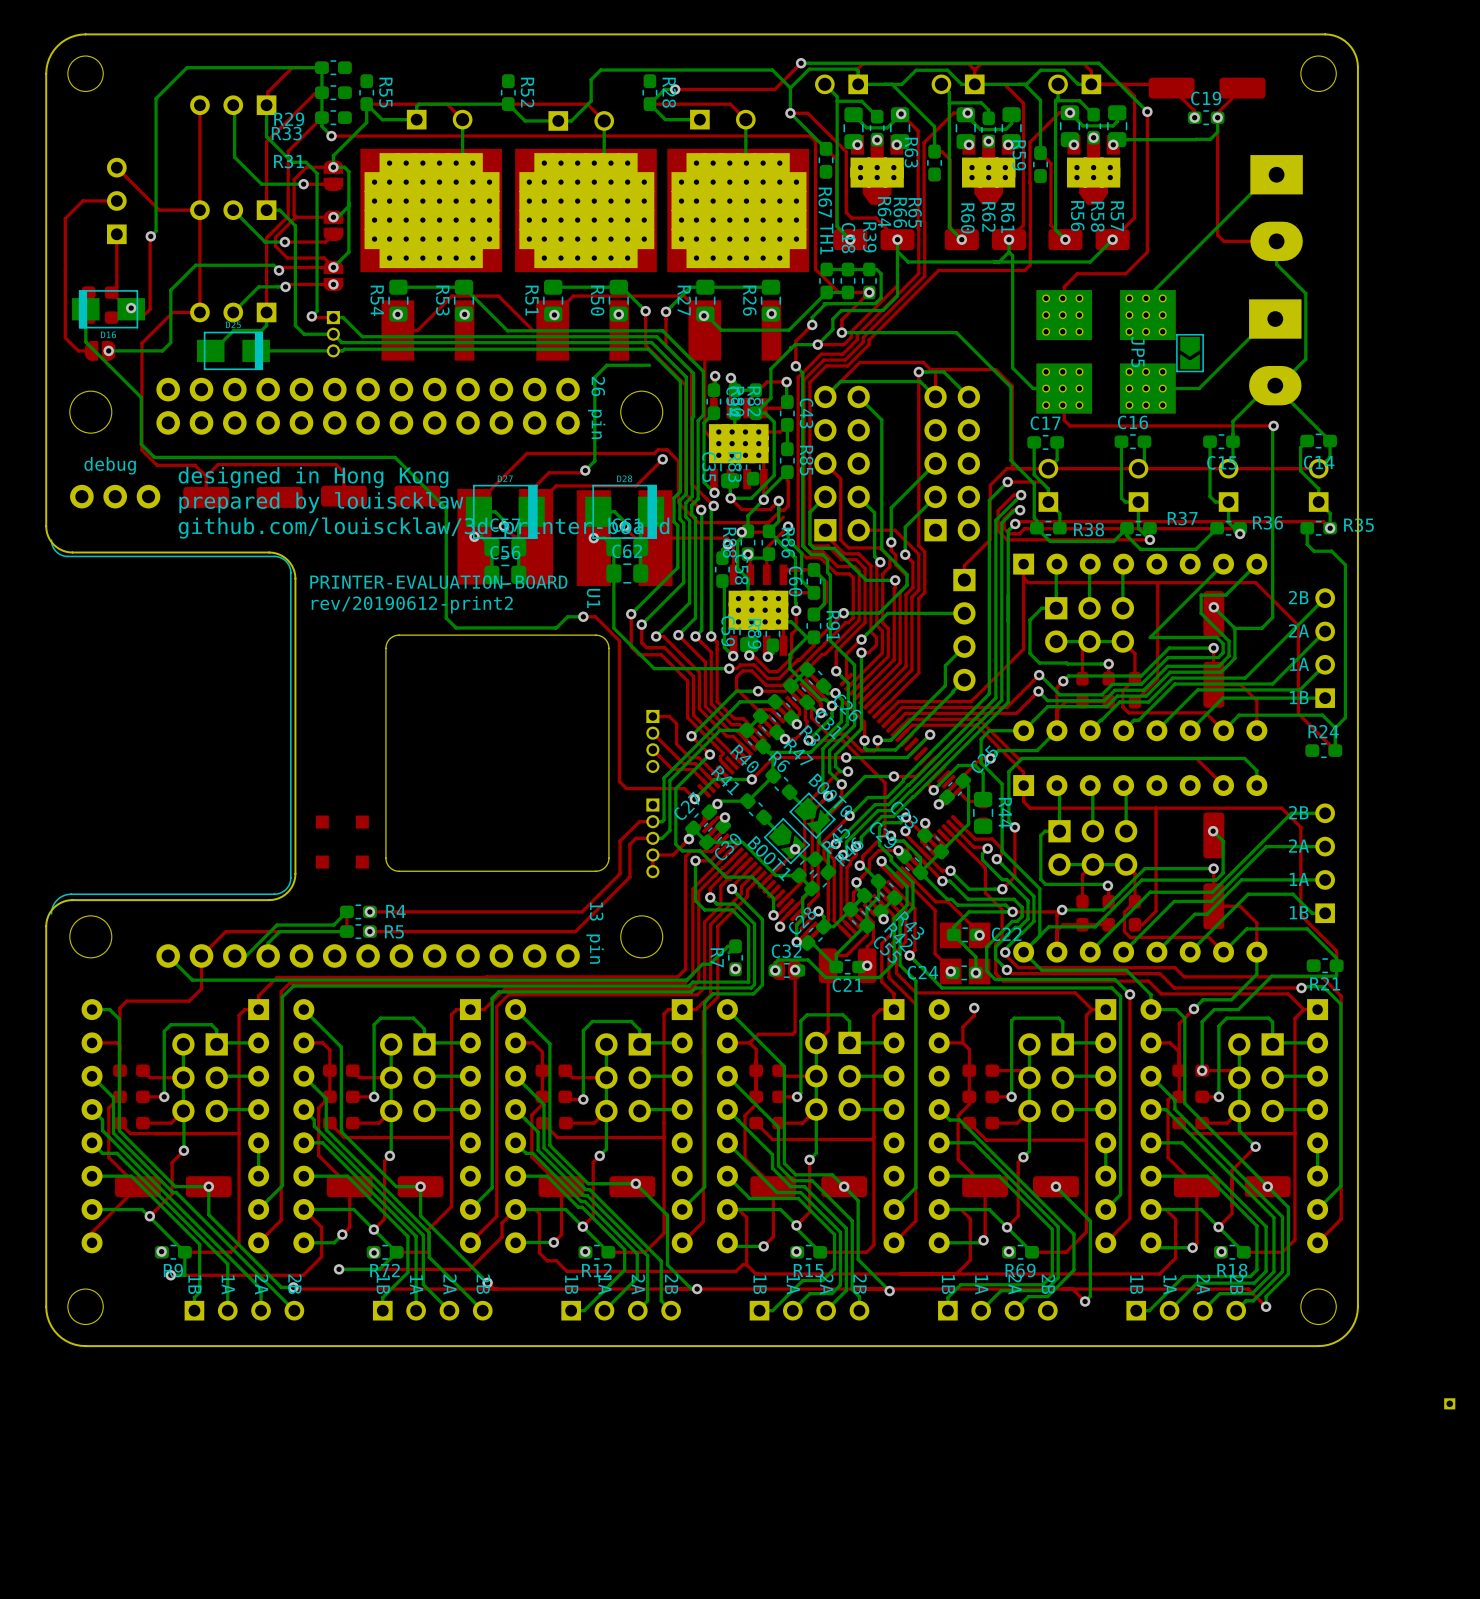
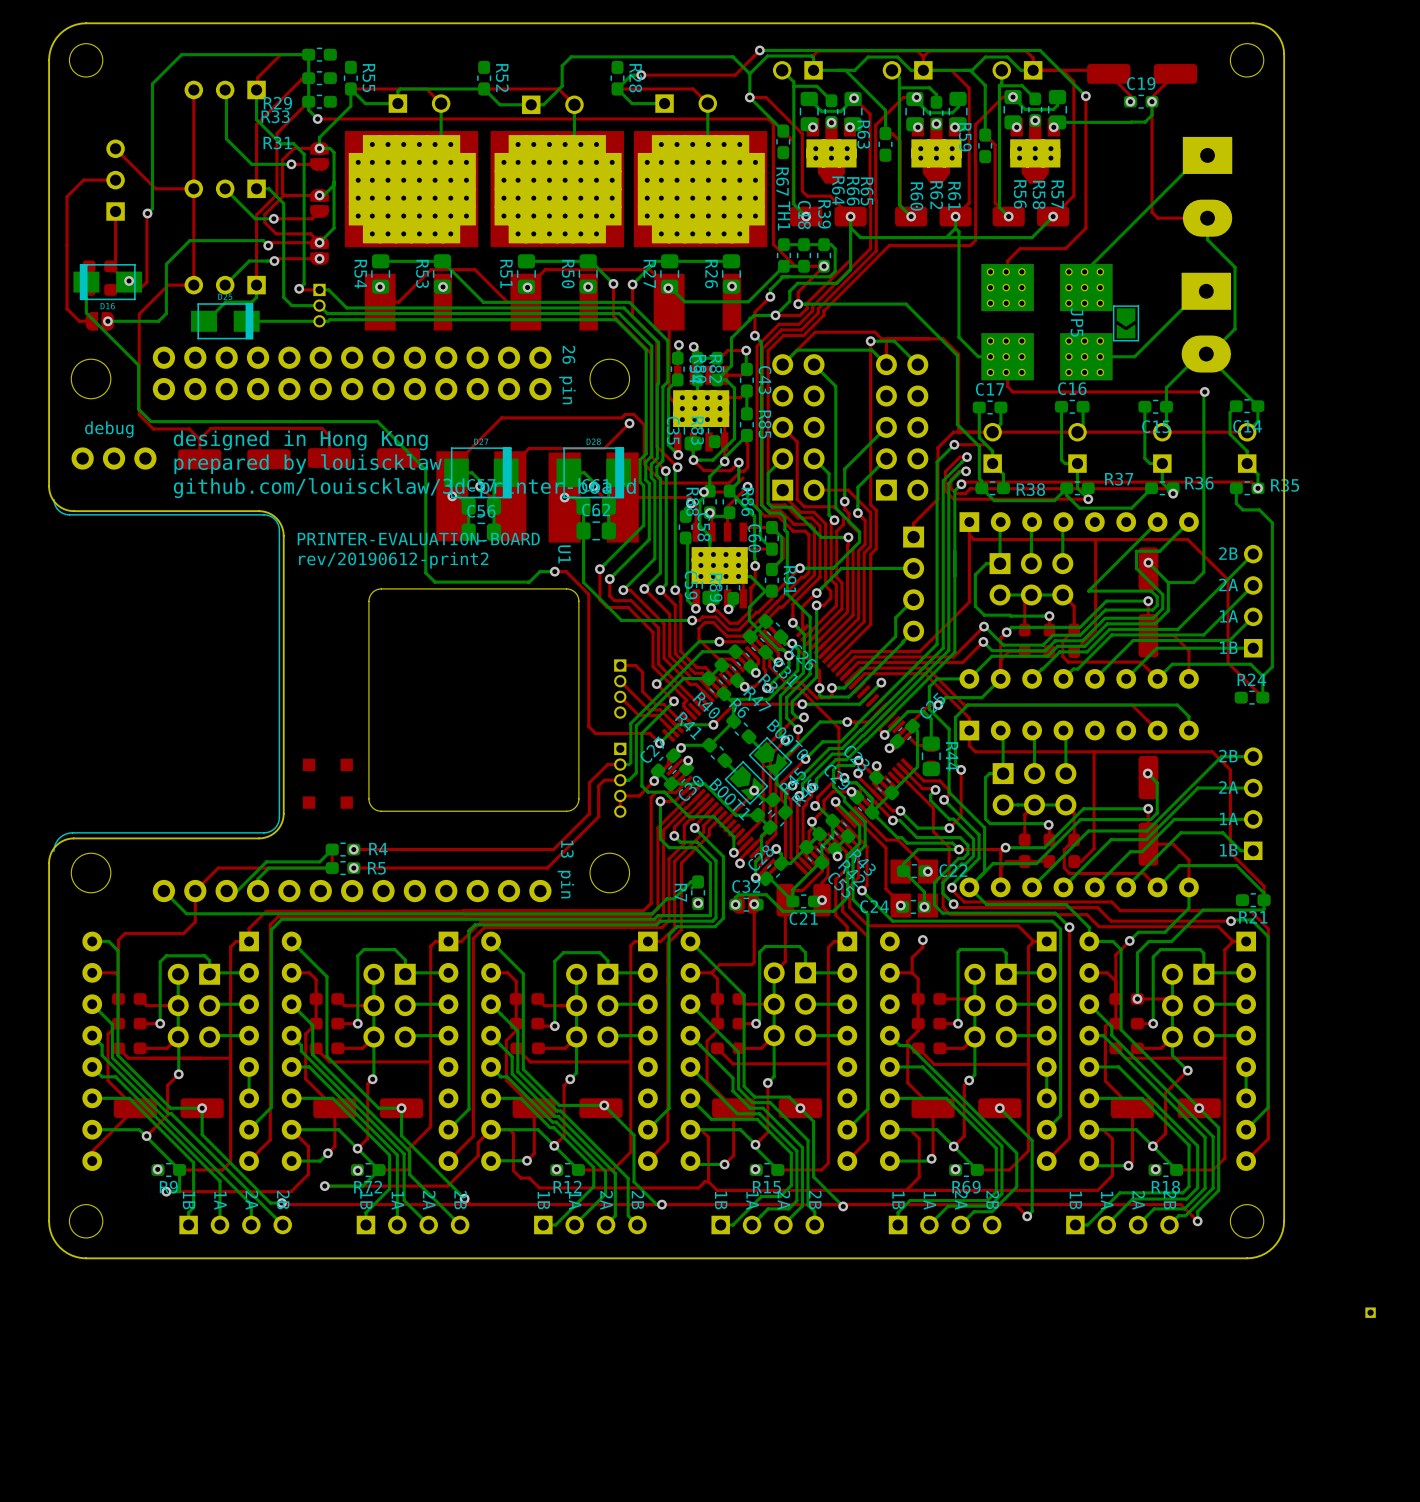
bottom track: (649, 365) (606, 365) (594, 377) (594, 461) (585, 470) -> none
top track: (585, 470) (583, 472) (548, 472) (536, 485) (536, 505) -> none
via: (585, 470) -> none

